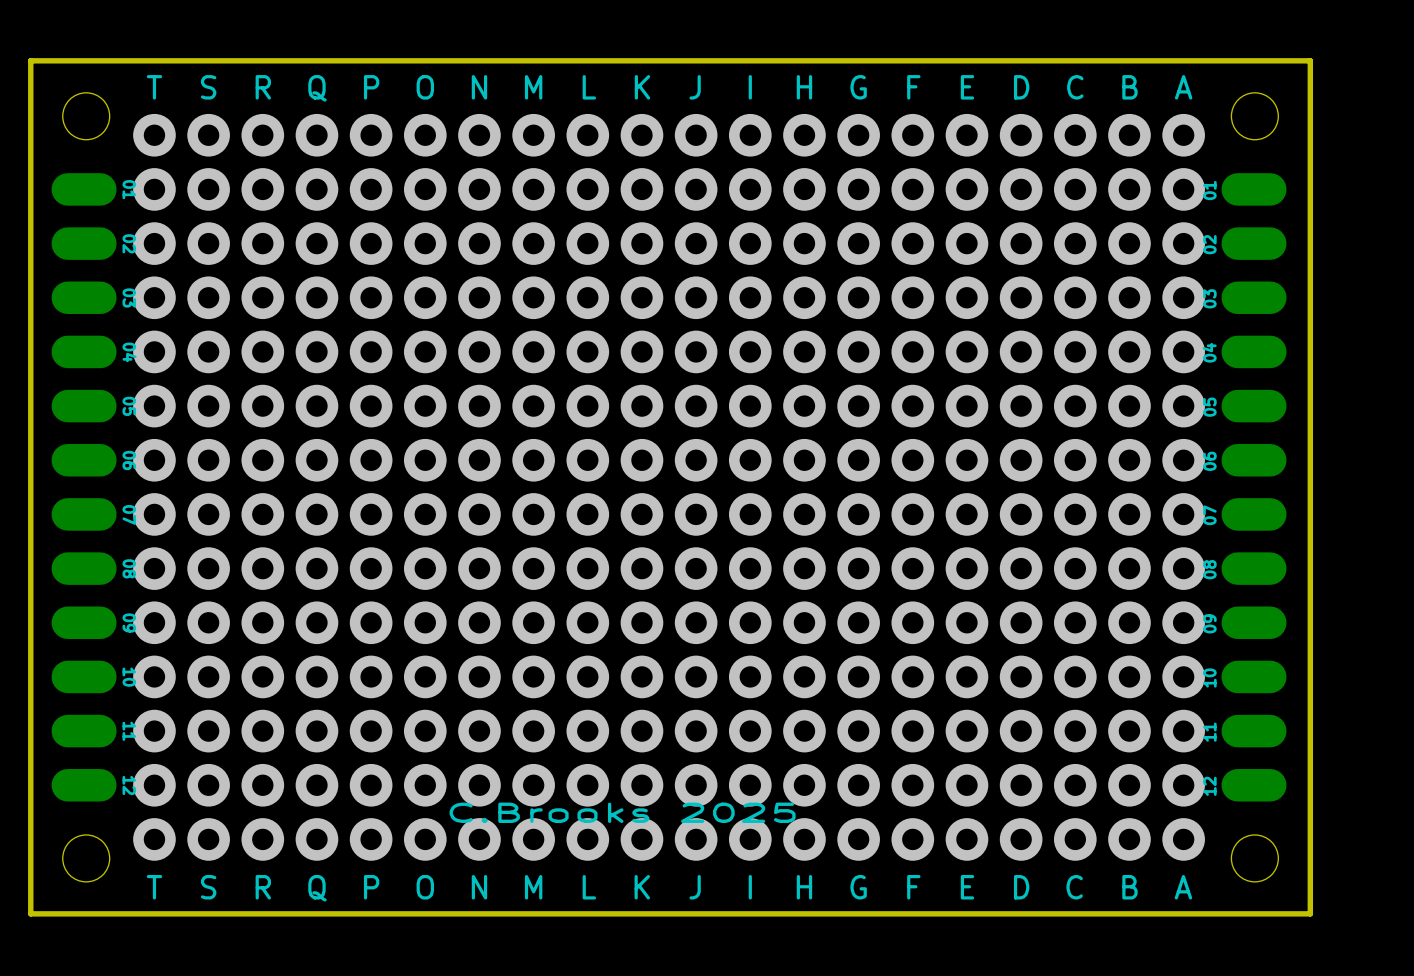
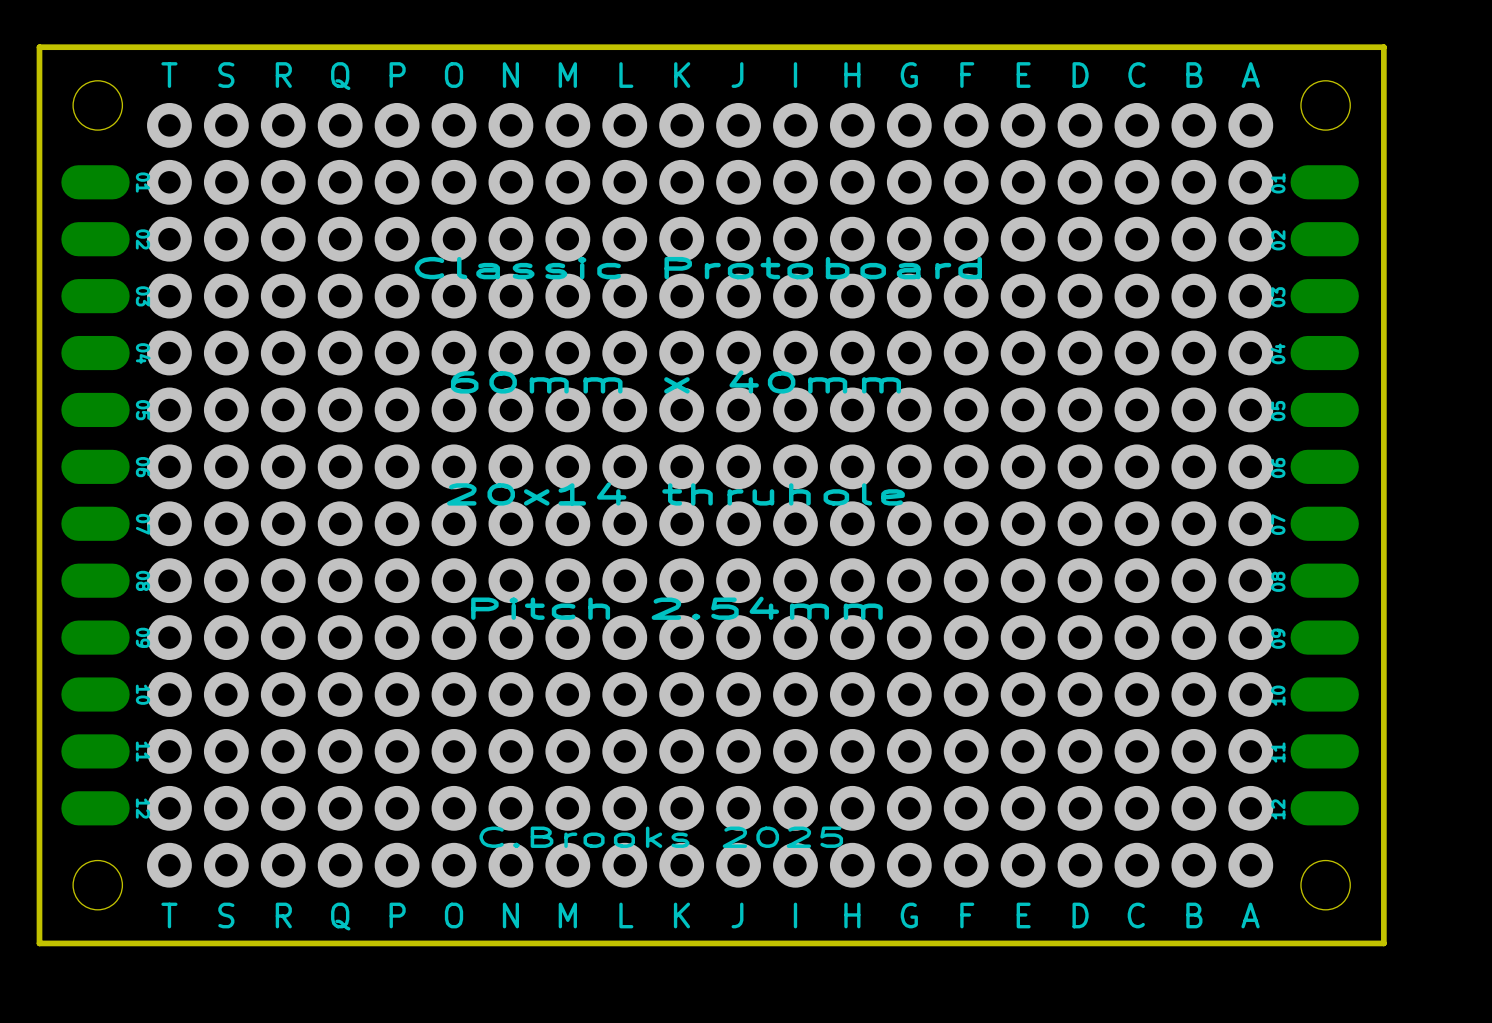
text: none -> Classic Protoboard (698, 268)
text: none -> 60mm x 40mm (675, 381)
text: none -> 20x14 thruhole (675, 493)
text: none -> Pitch 2.54mm (676, 608)

